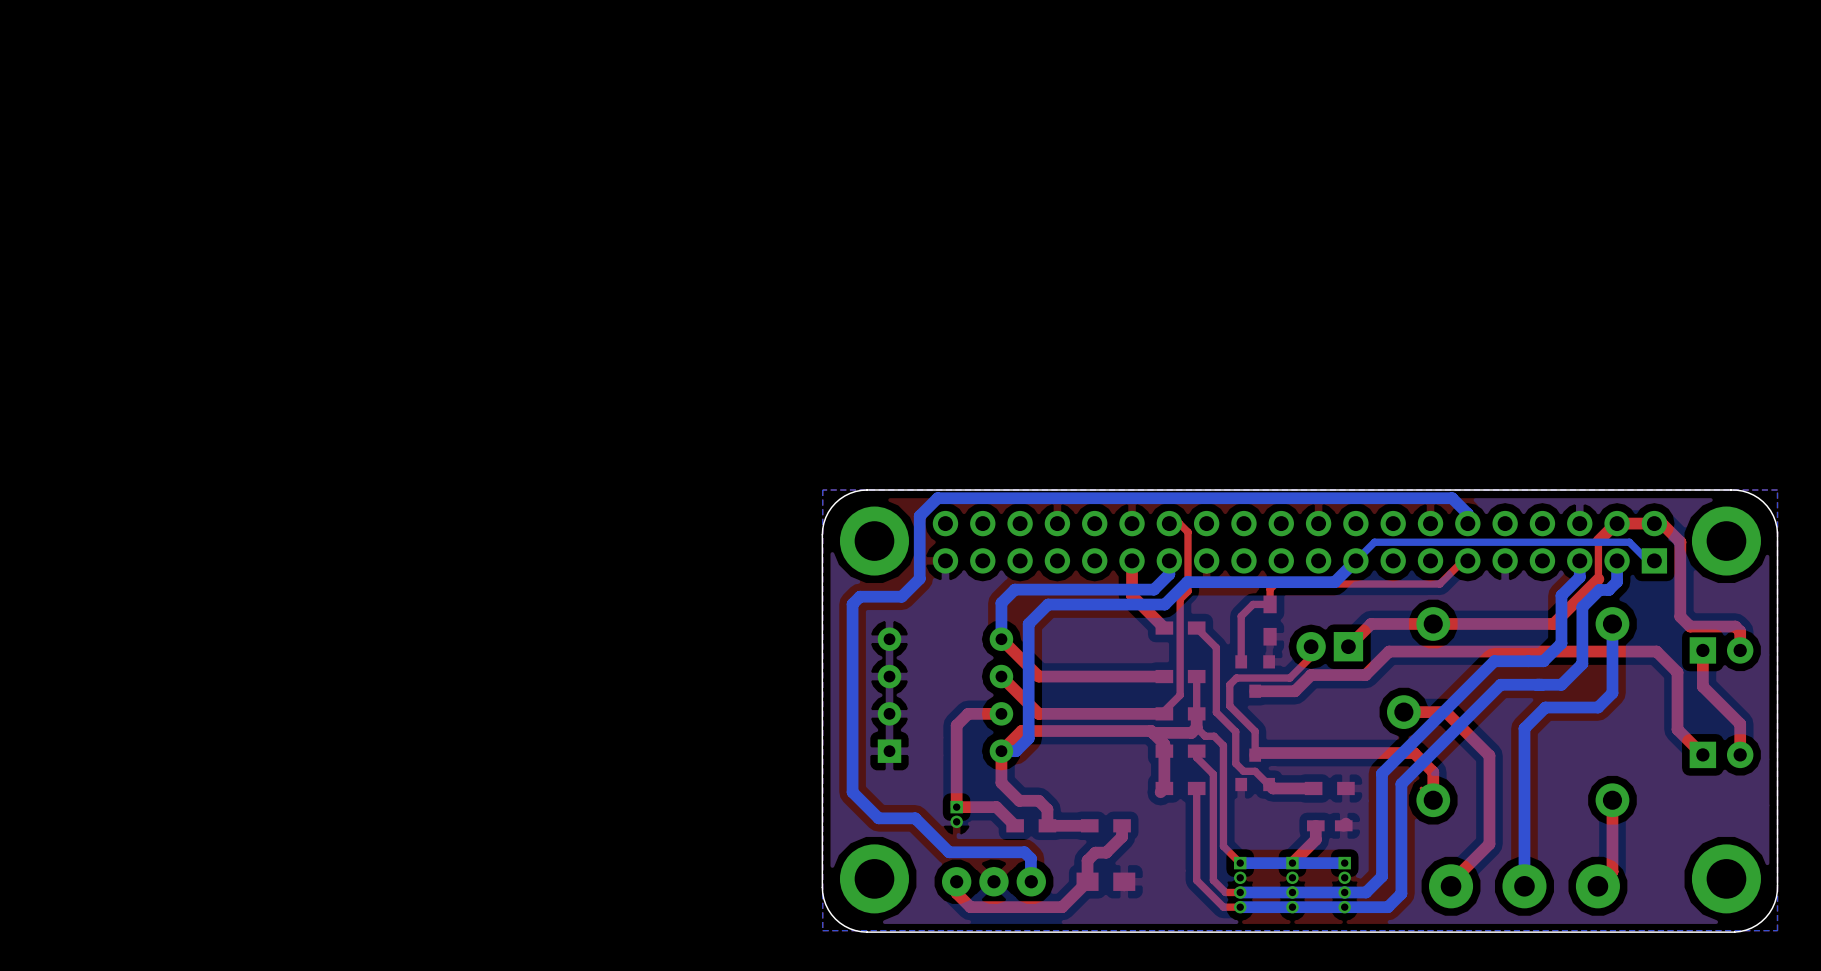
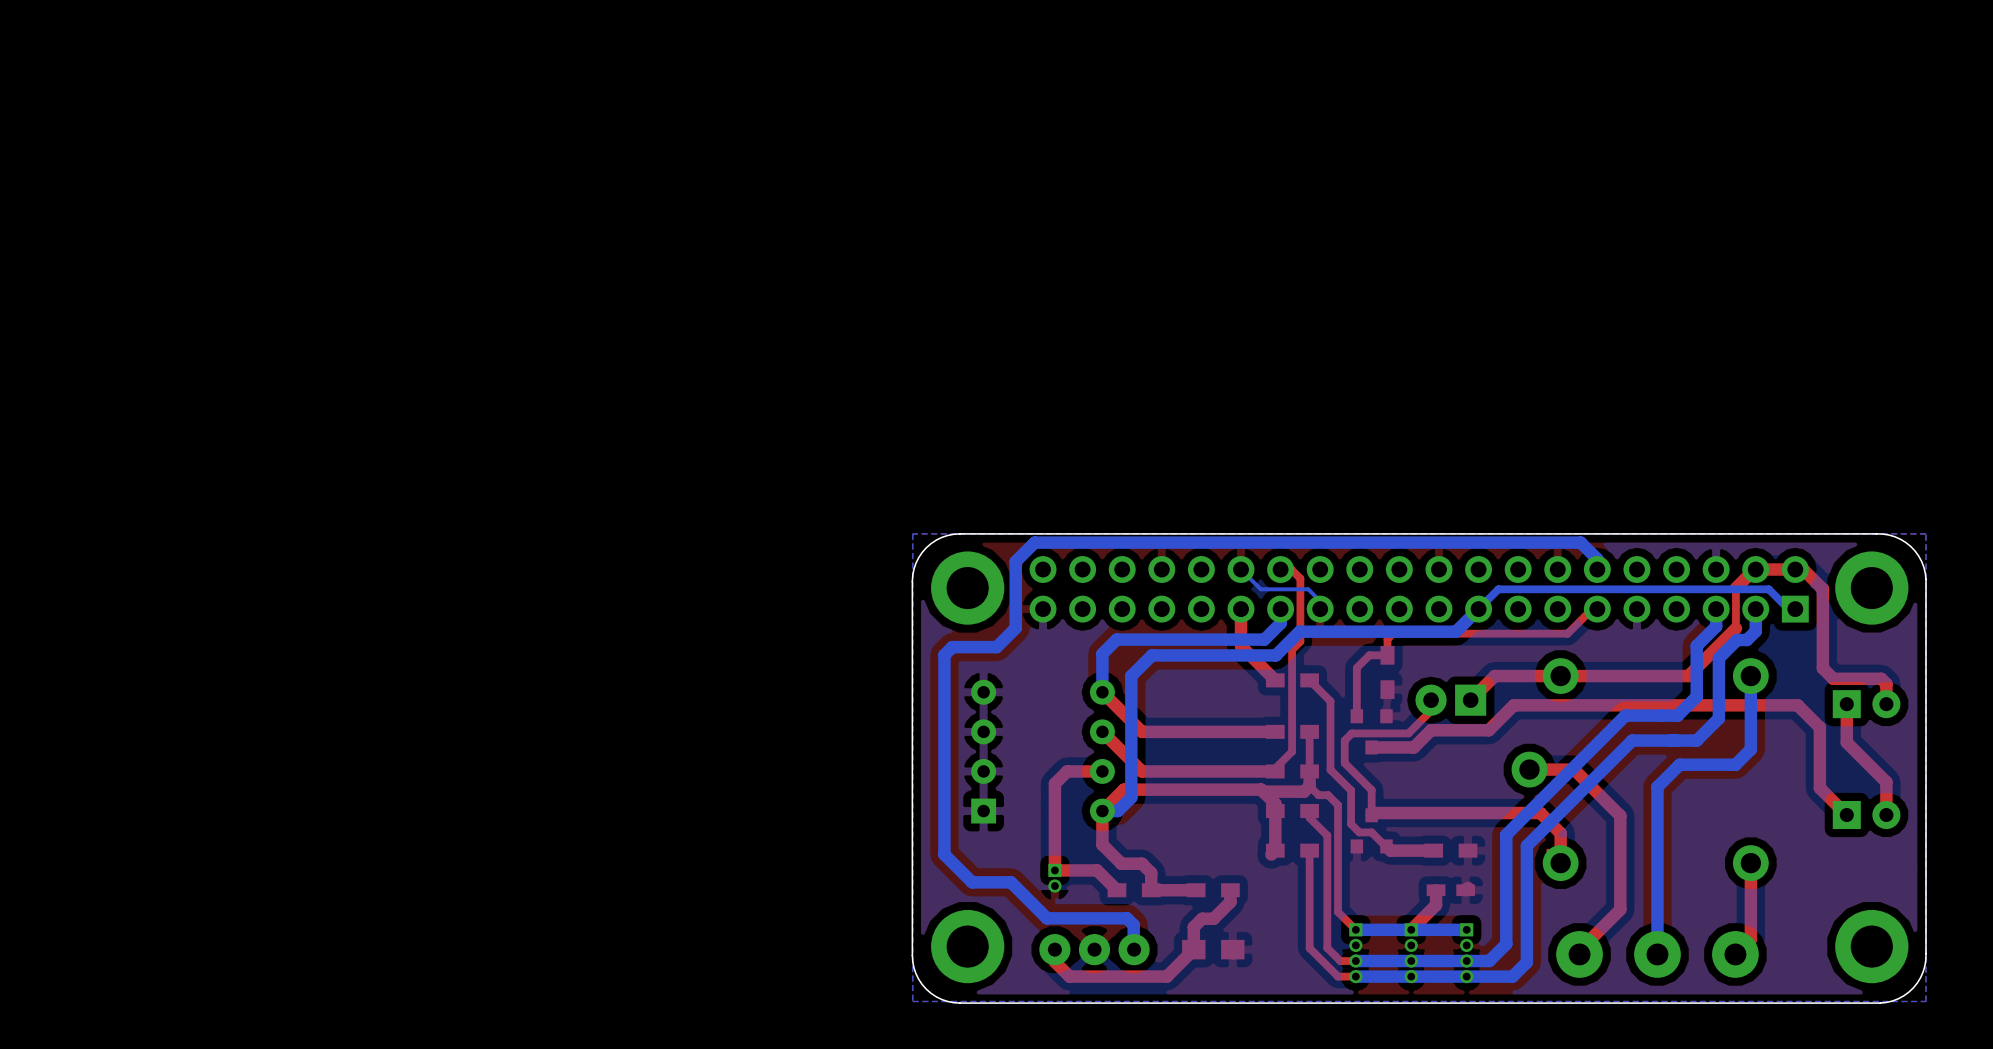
bottom track: none -> (1241, 569) (1260, 589) (1308, 589) (1320, 601)

